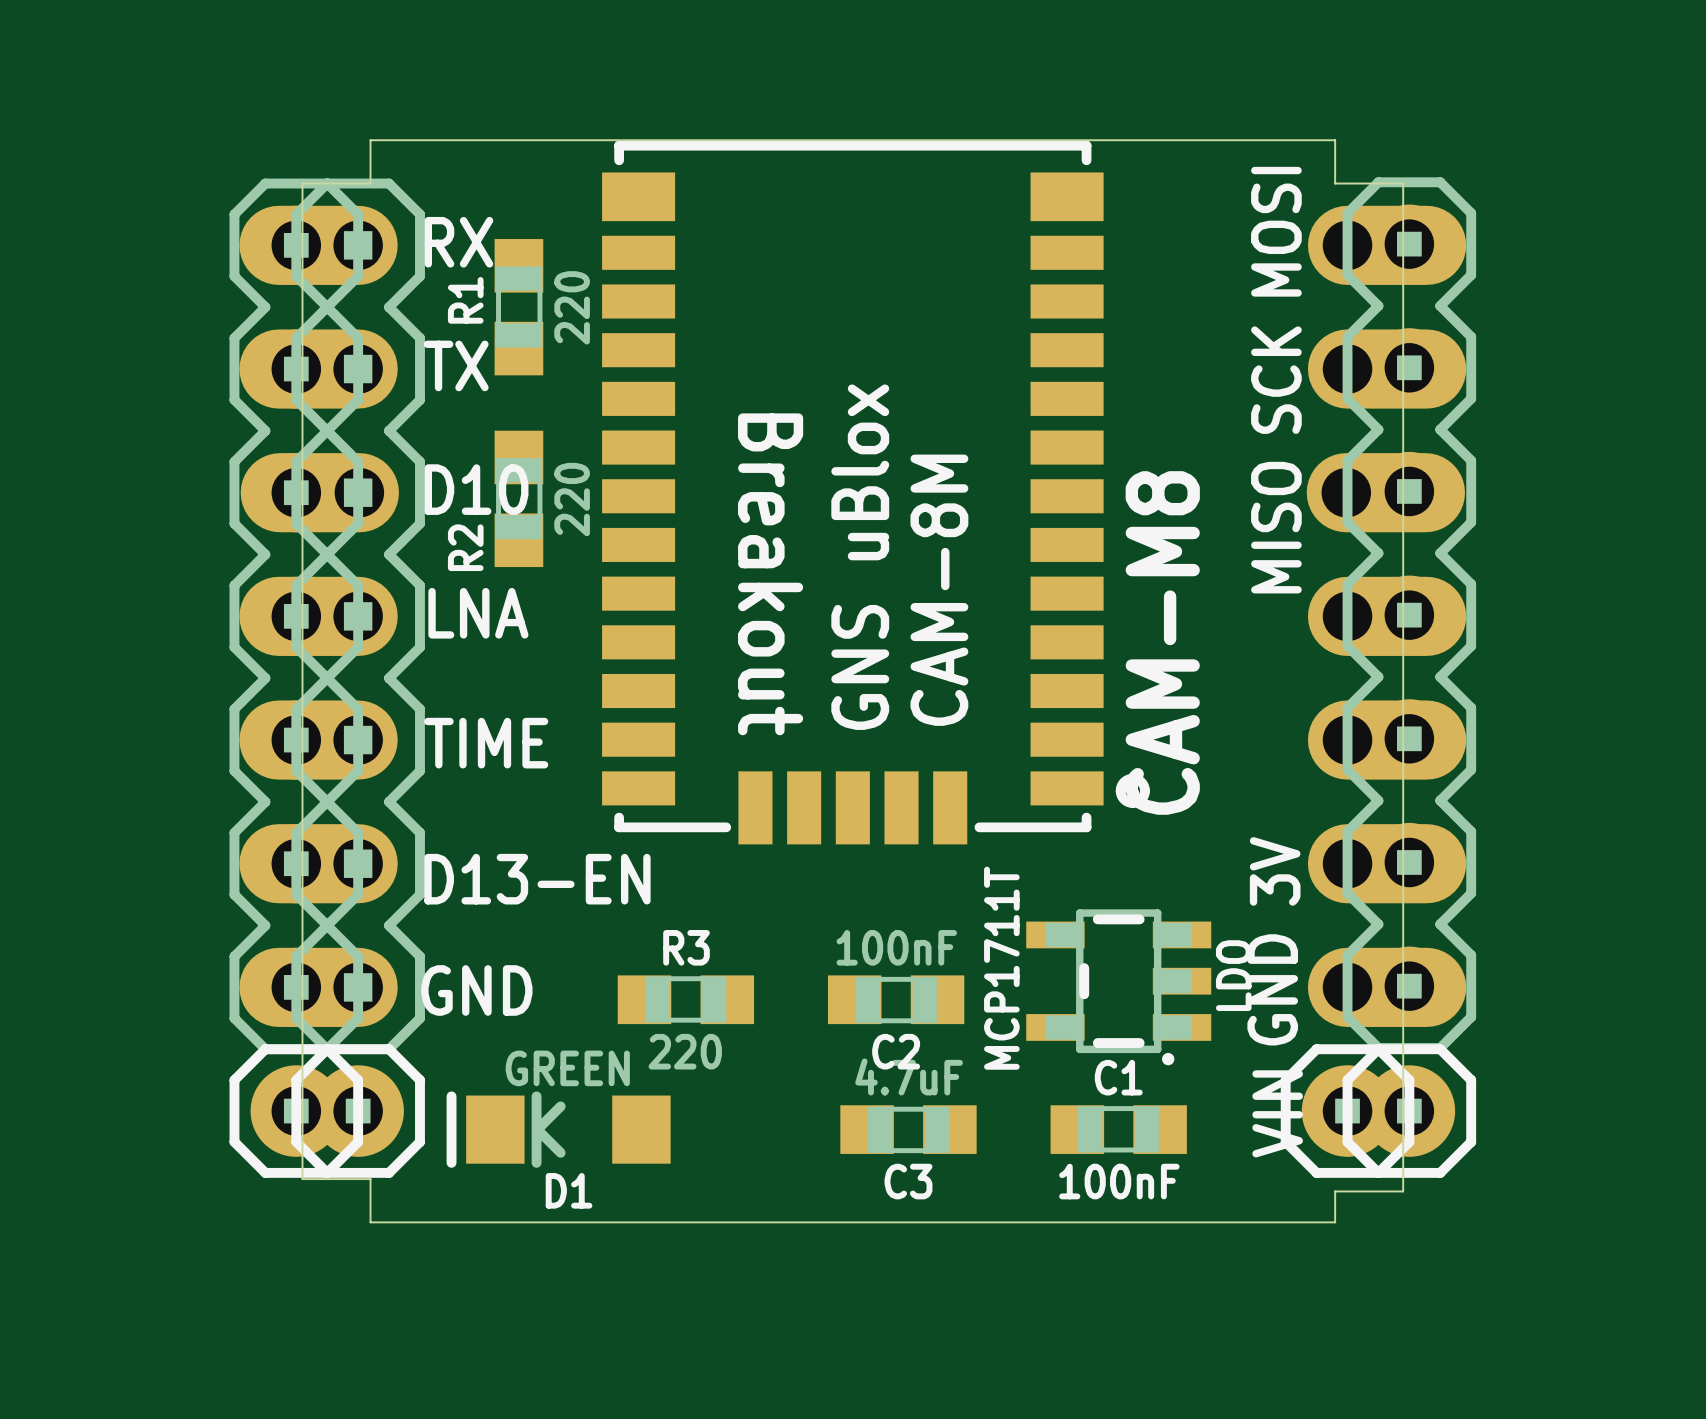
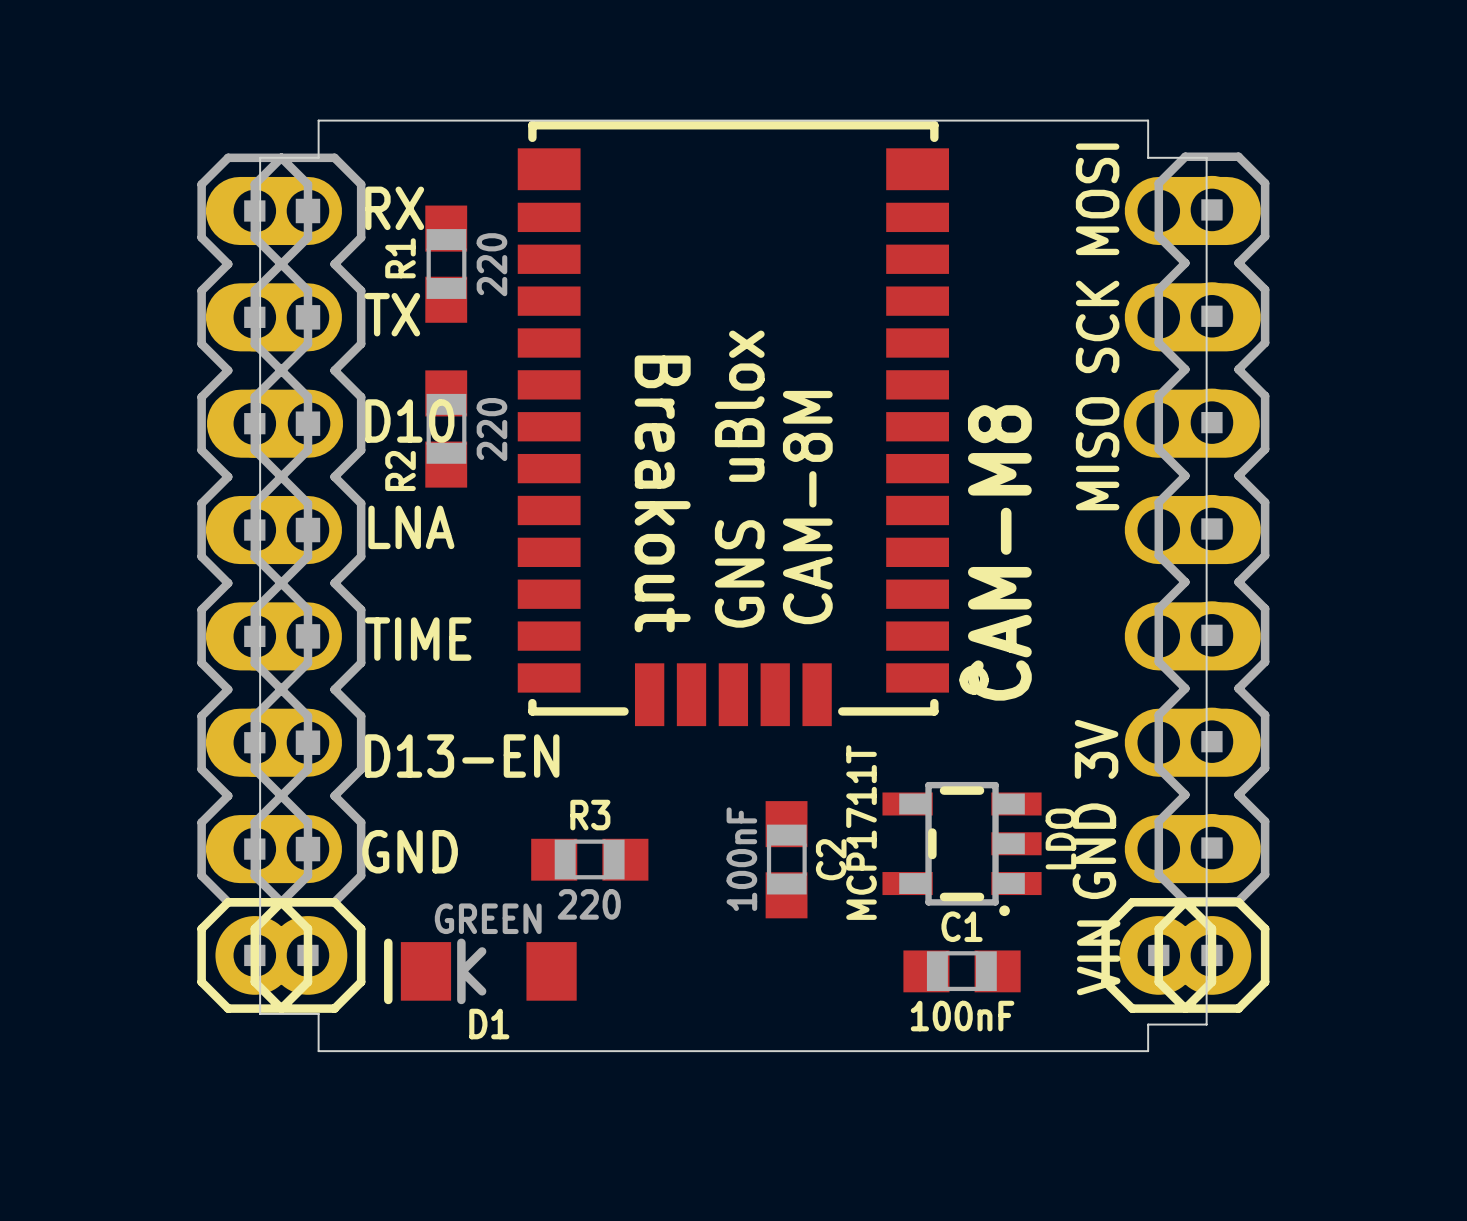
C2 rotation: 0° (896, 999) -> 90° clockwise (786, 859)
C3: 4.7uF (908, 1129) -> none

